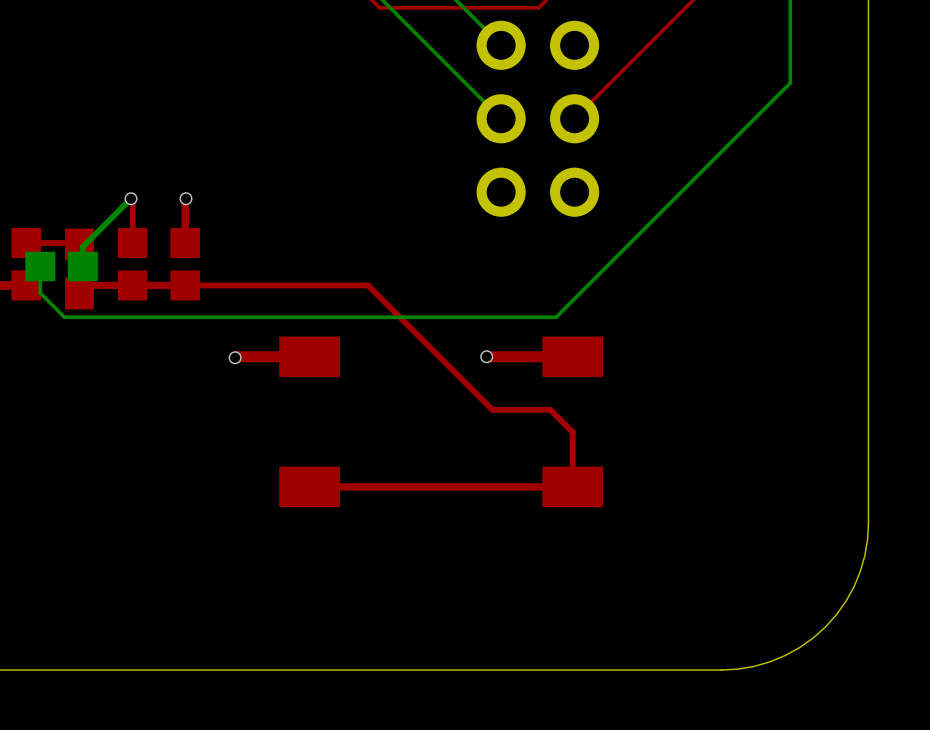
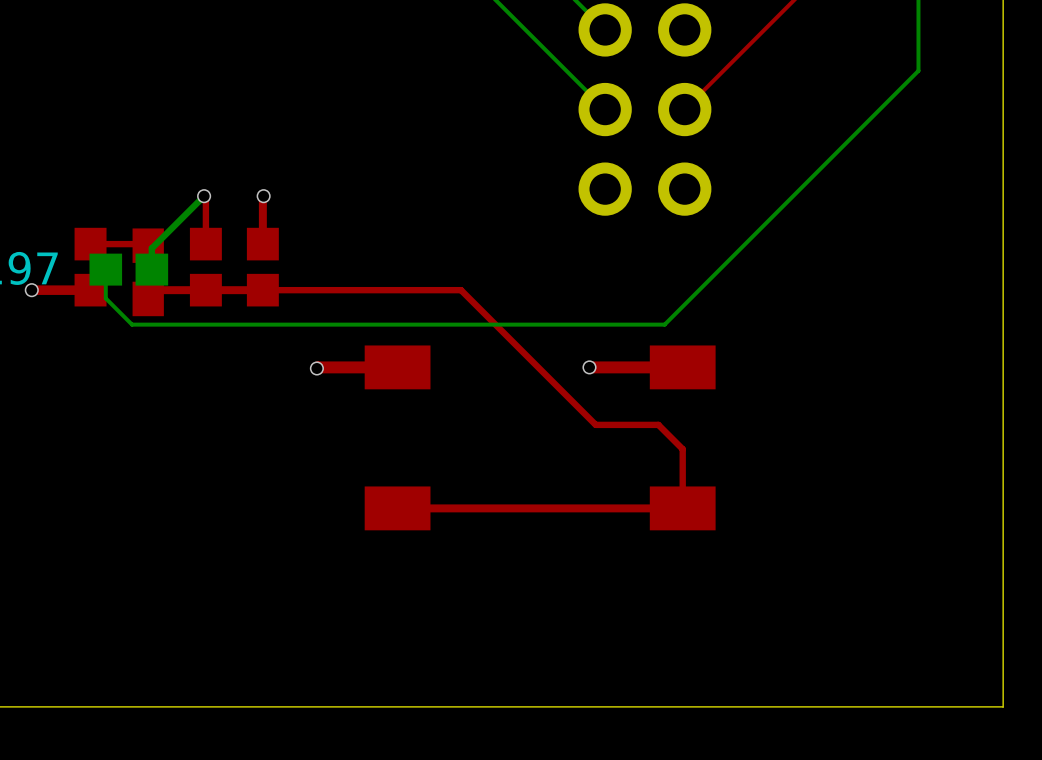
board edge: (868, 523) (867, 539) (860, 571) (845, 601) (825, 627) (799, 647) (770, 661) (738, 669) (721, 670) -> (1003, 547) (1003, 706) (844, 706)

